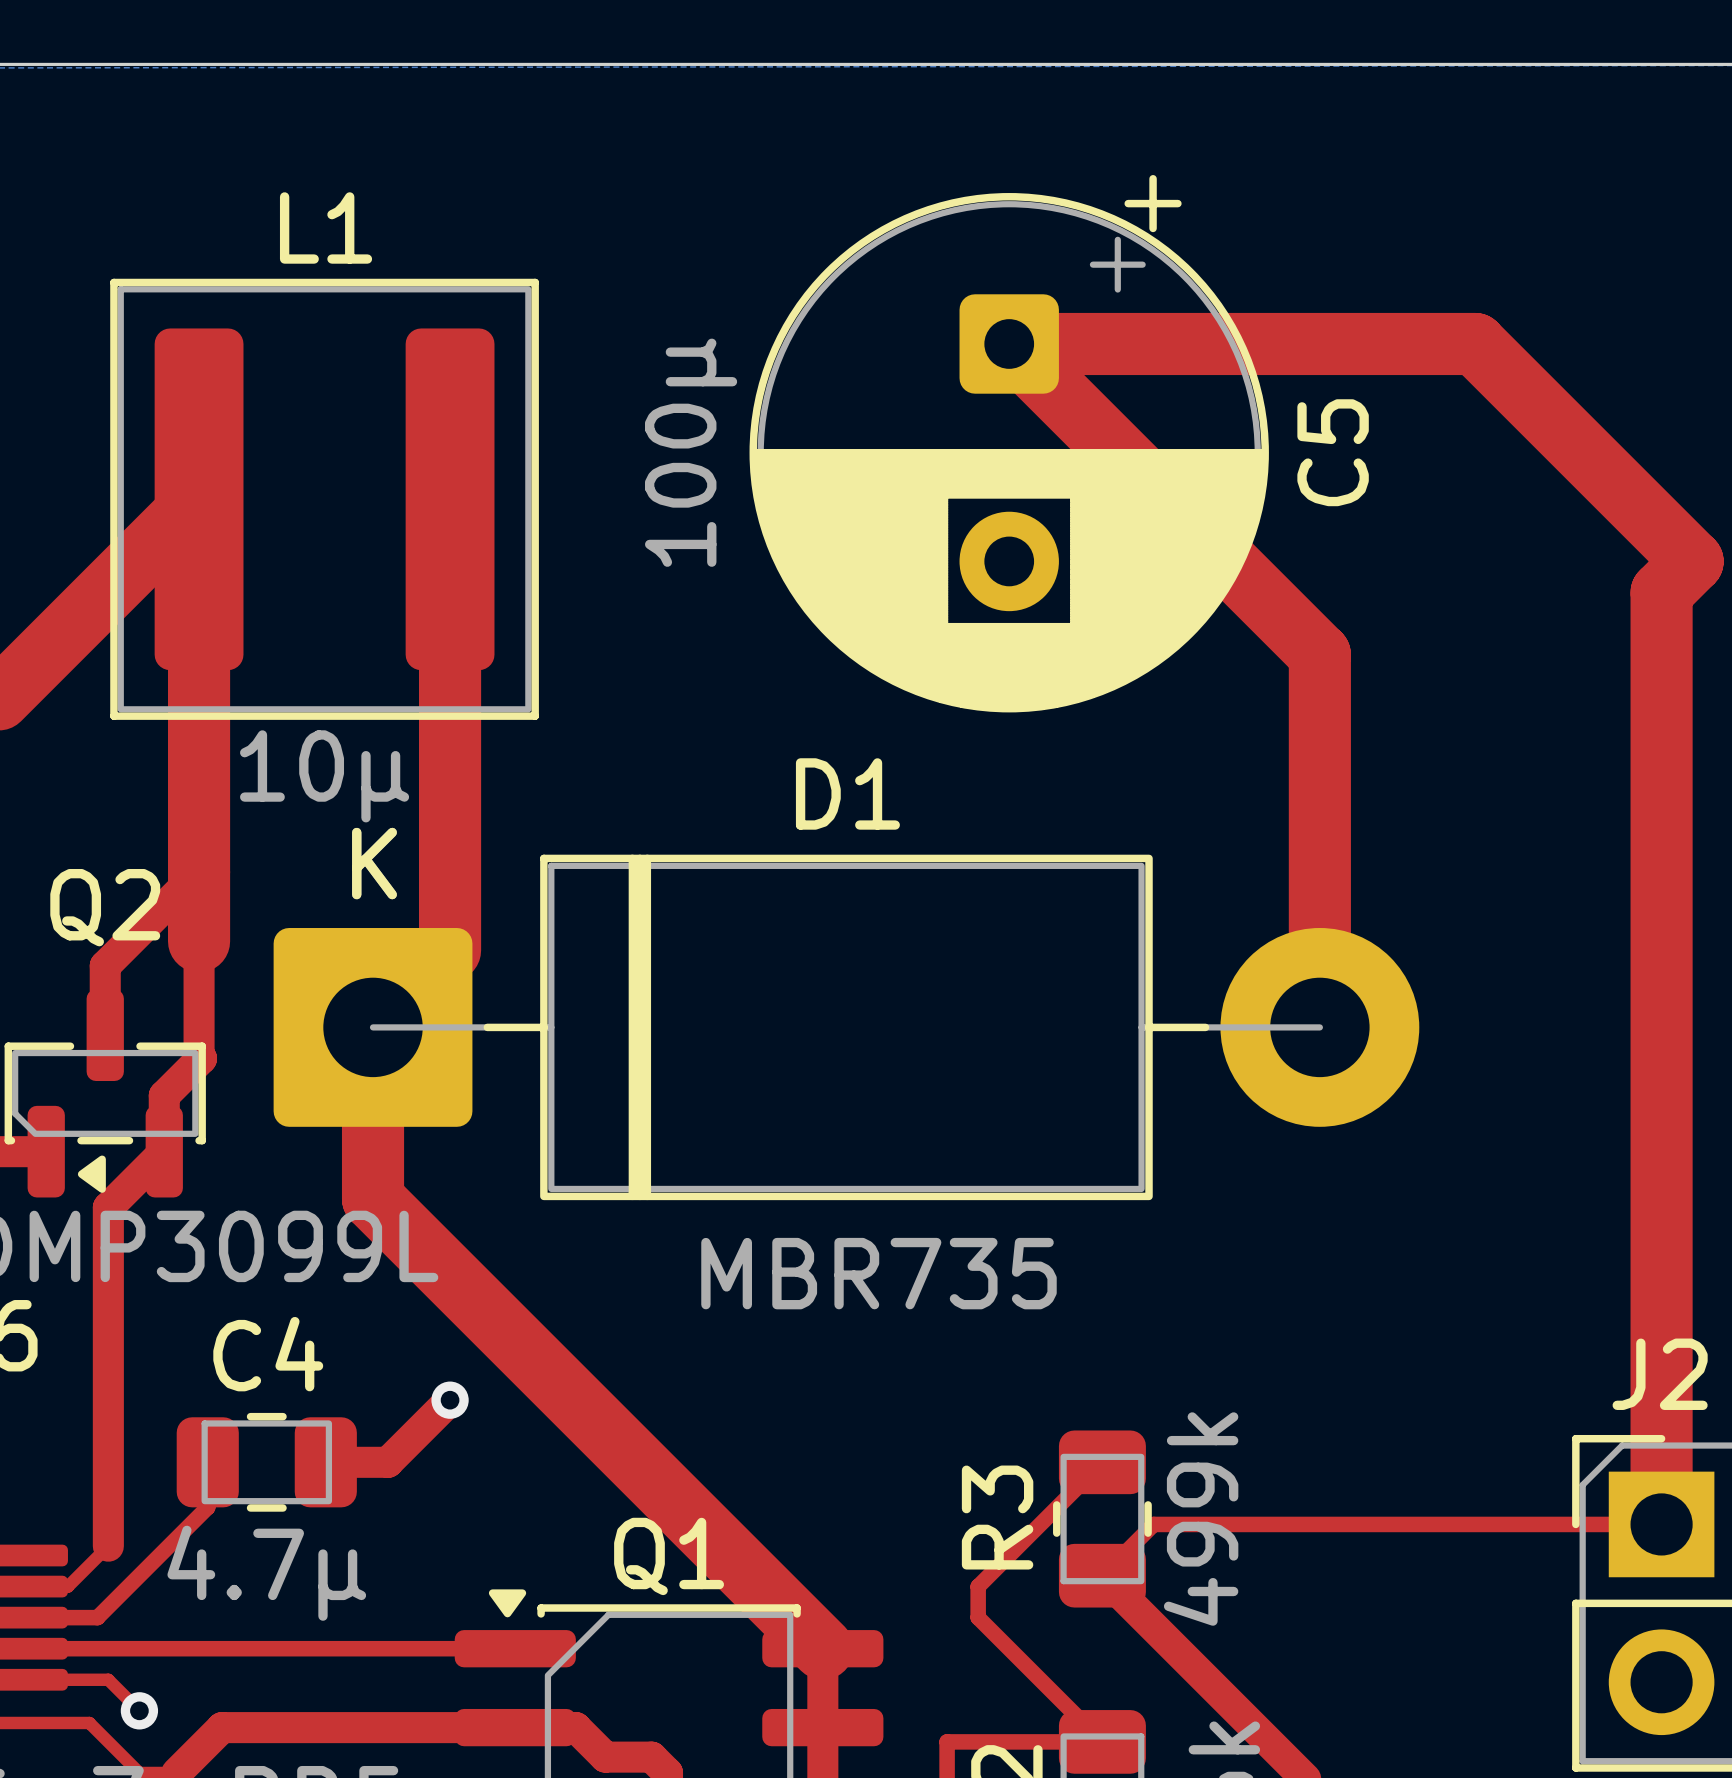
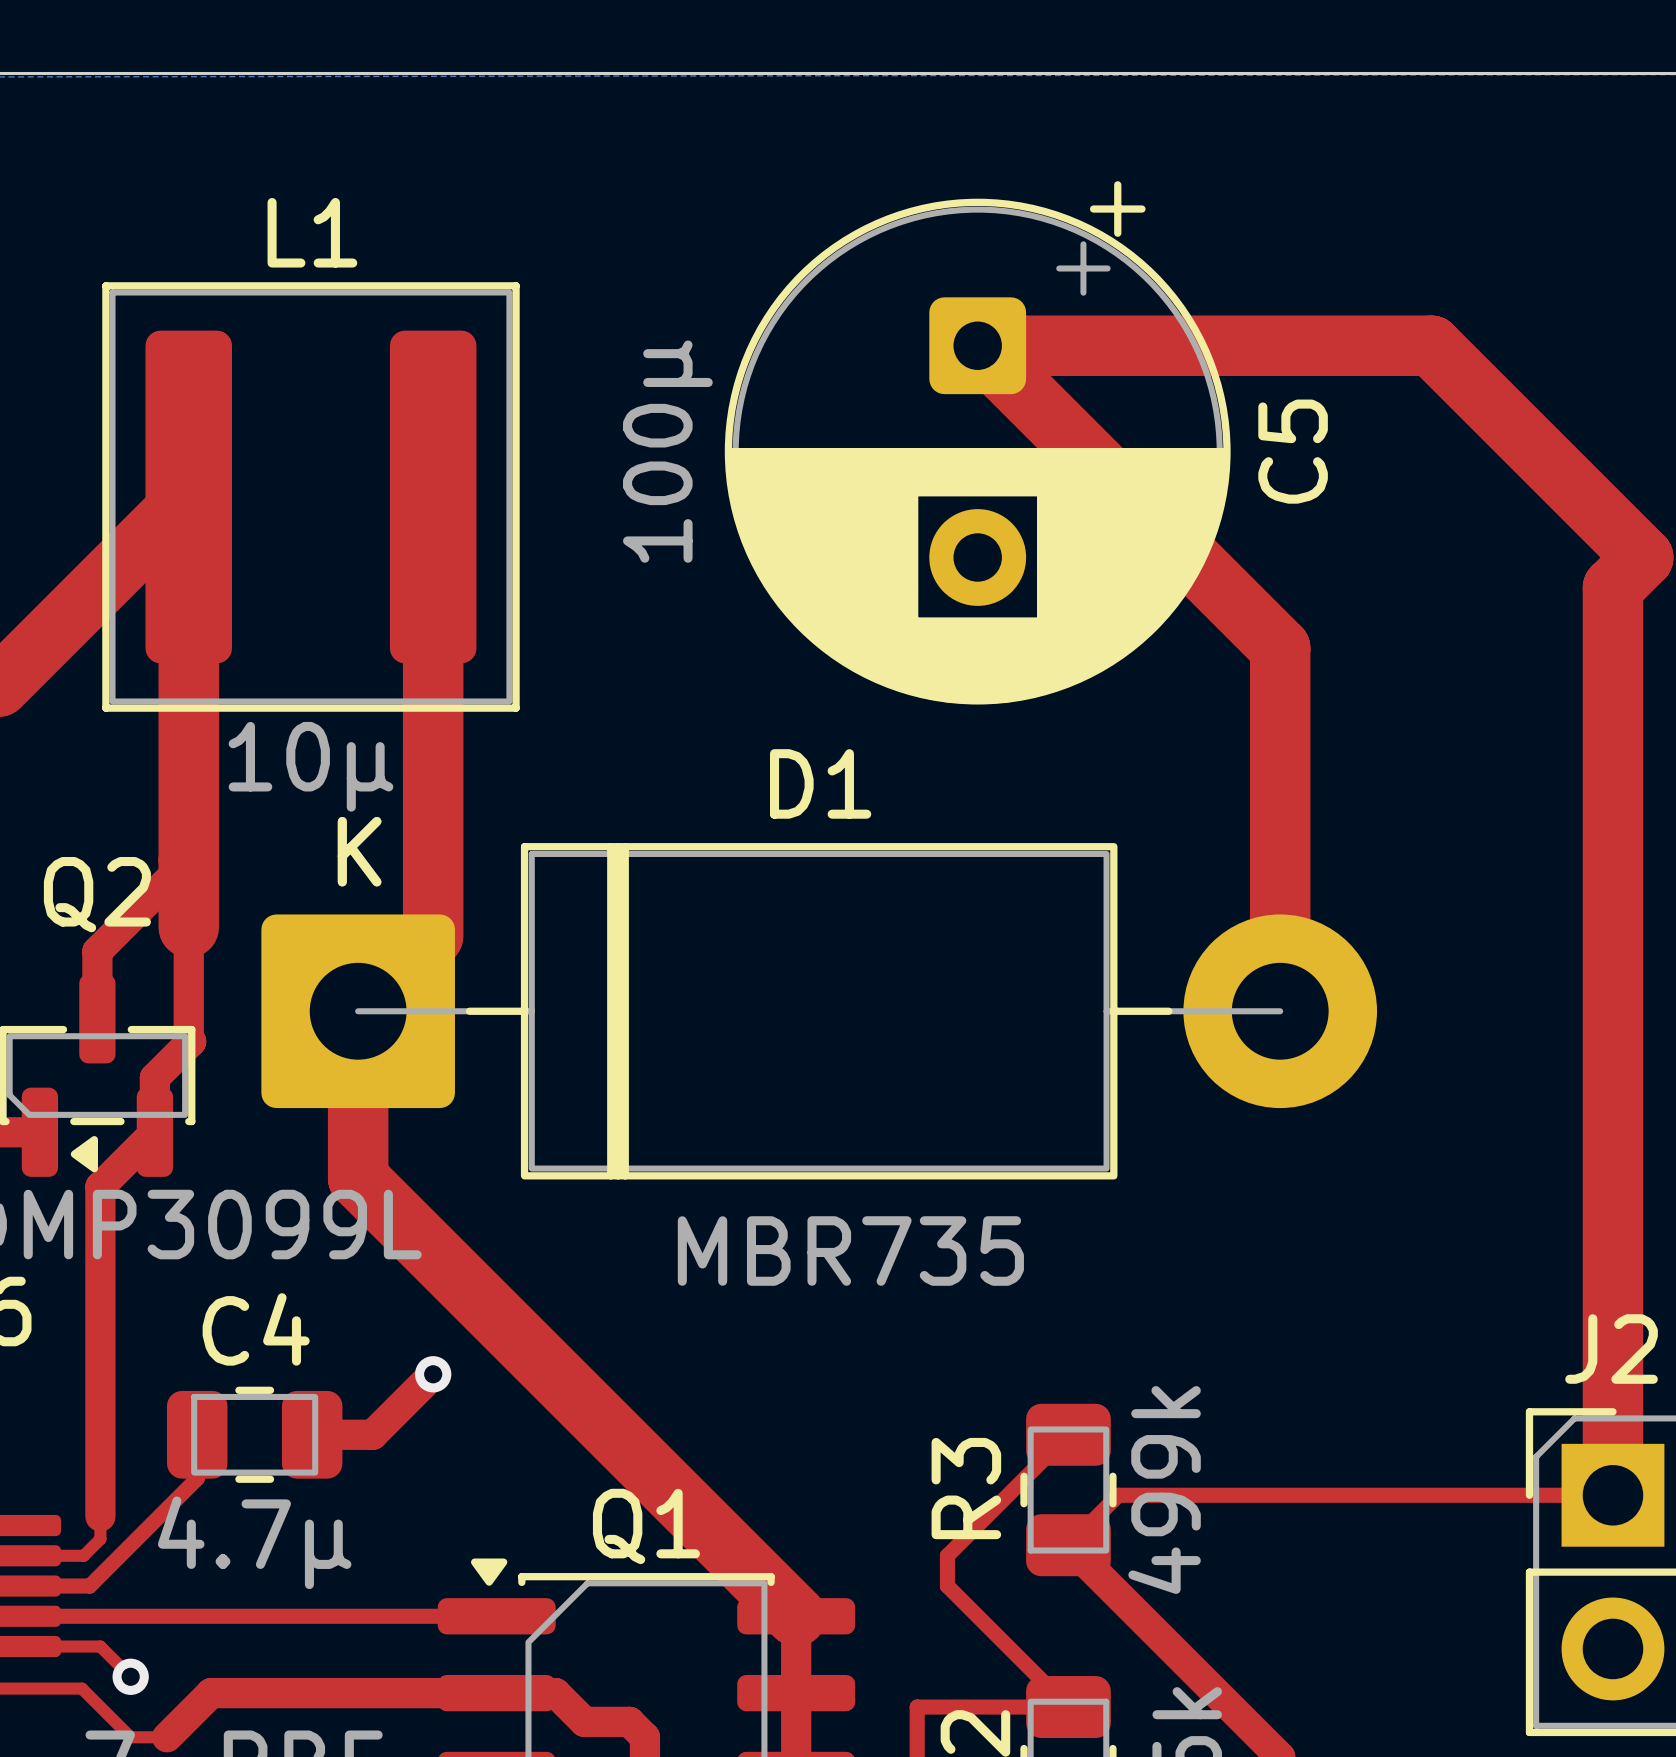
top track: (108, 1546) (67, 1586) -> (100, 1516) (100, 1539) (83, 1555) (61, 1555)

